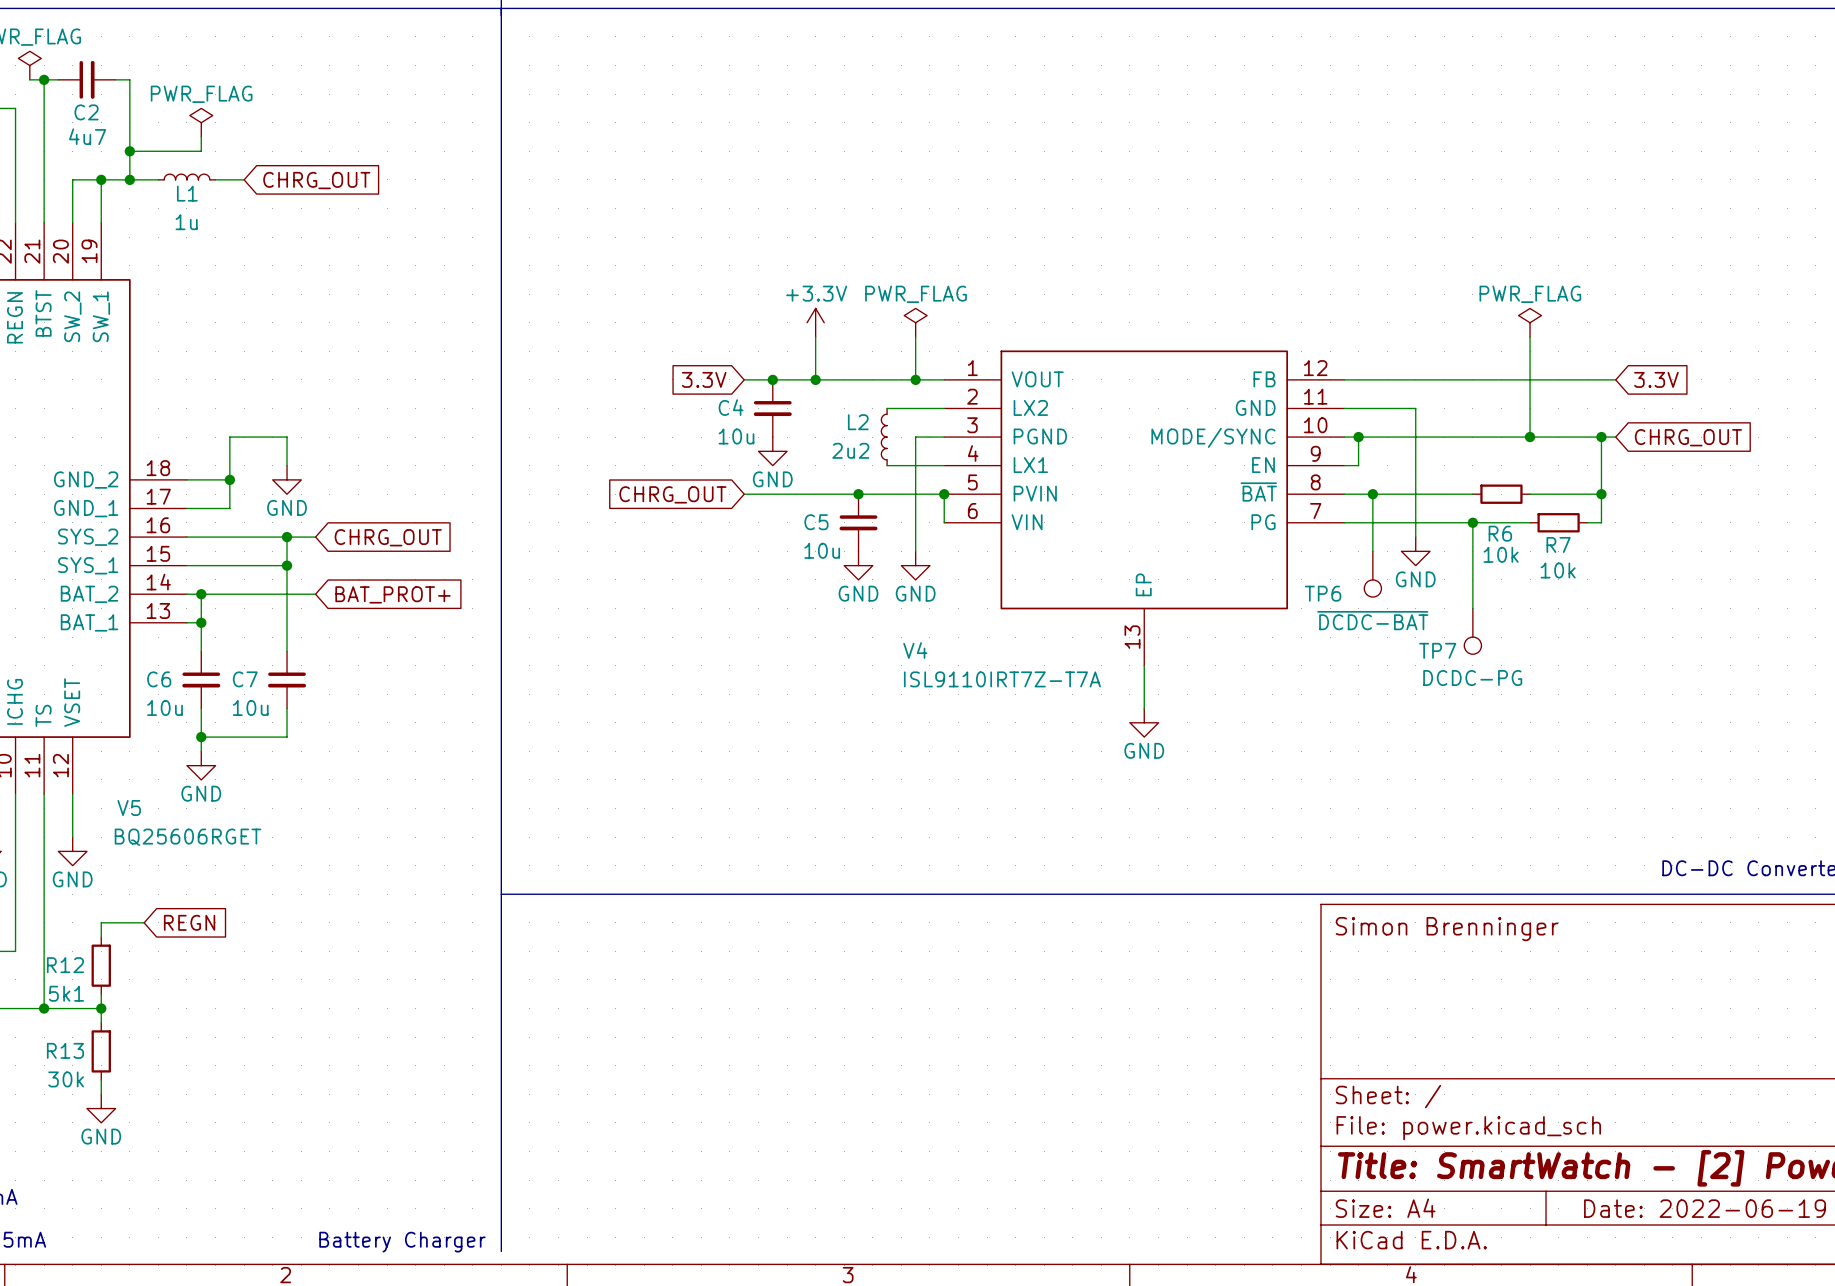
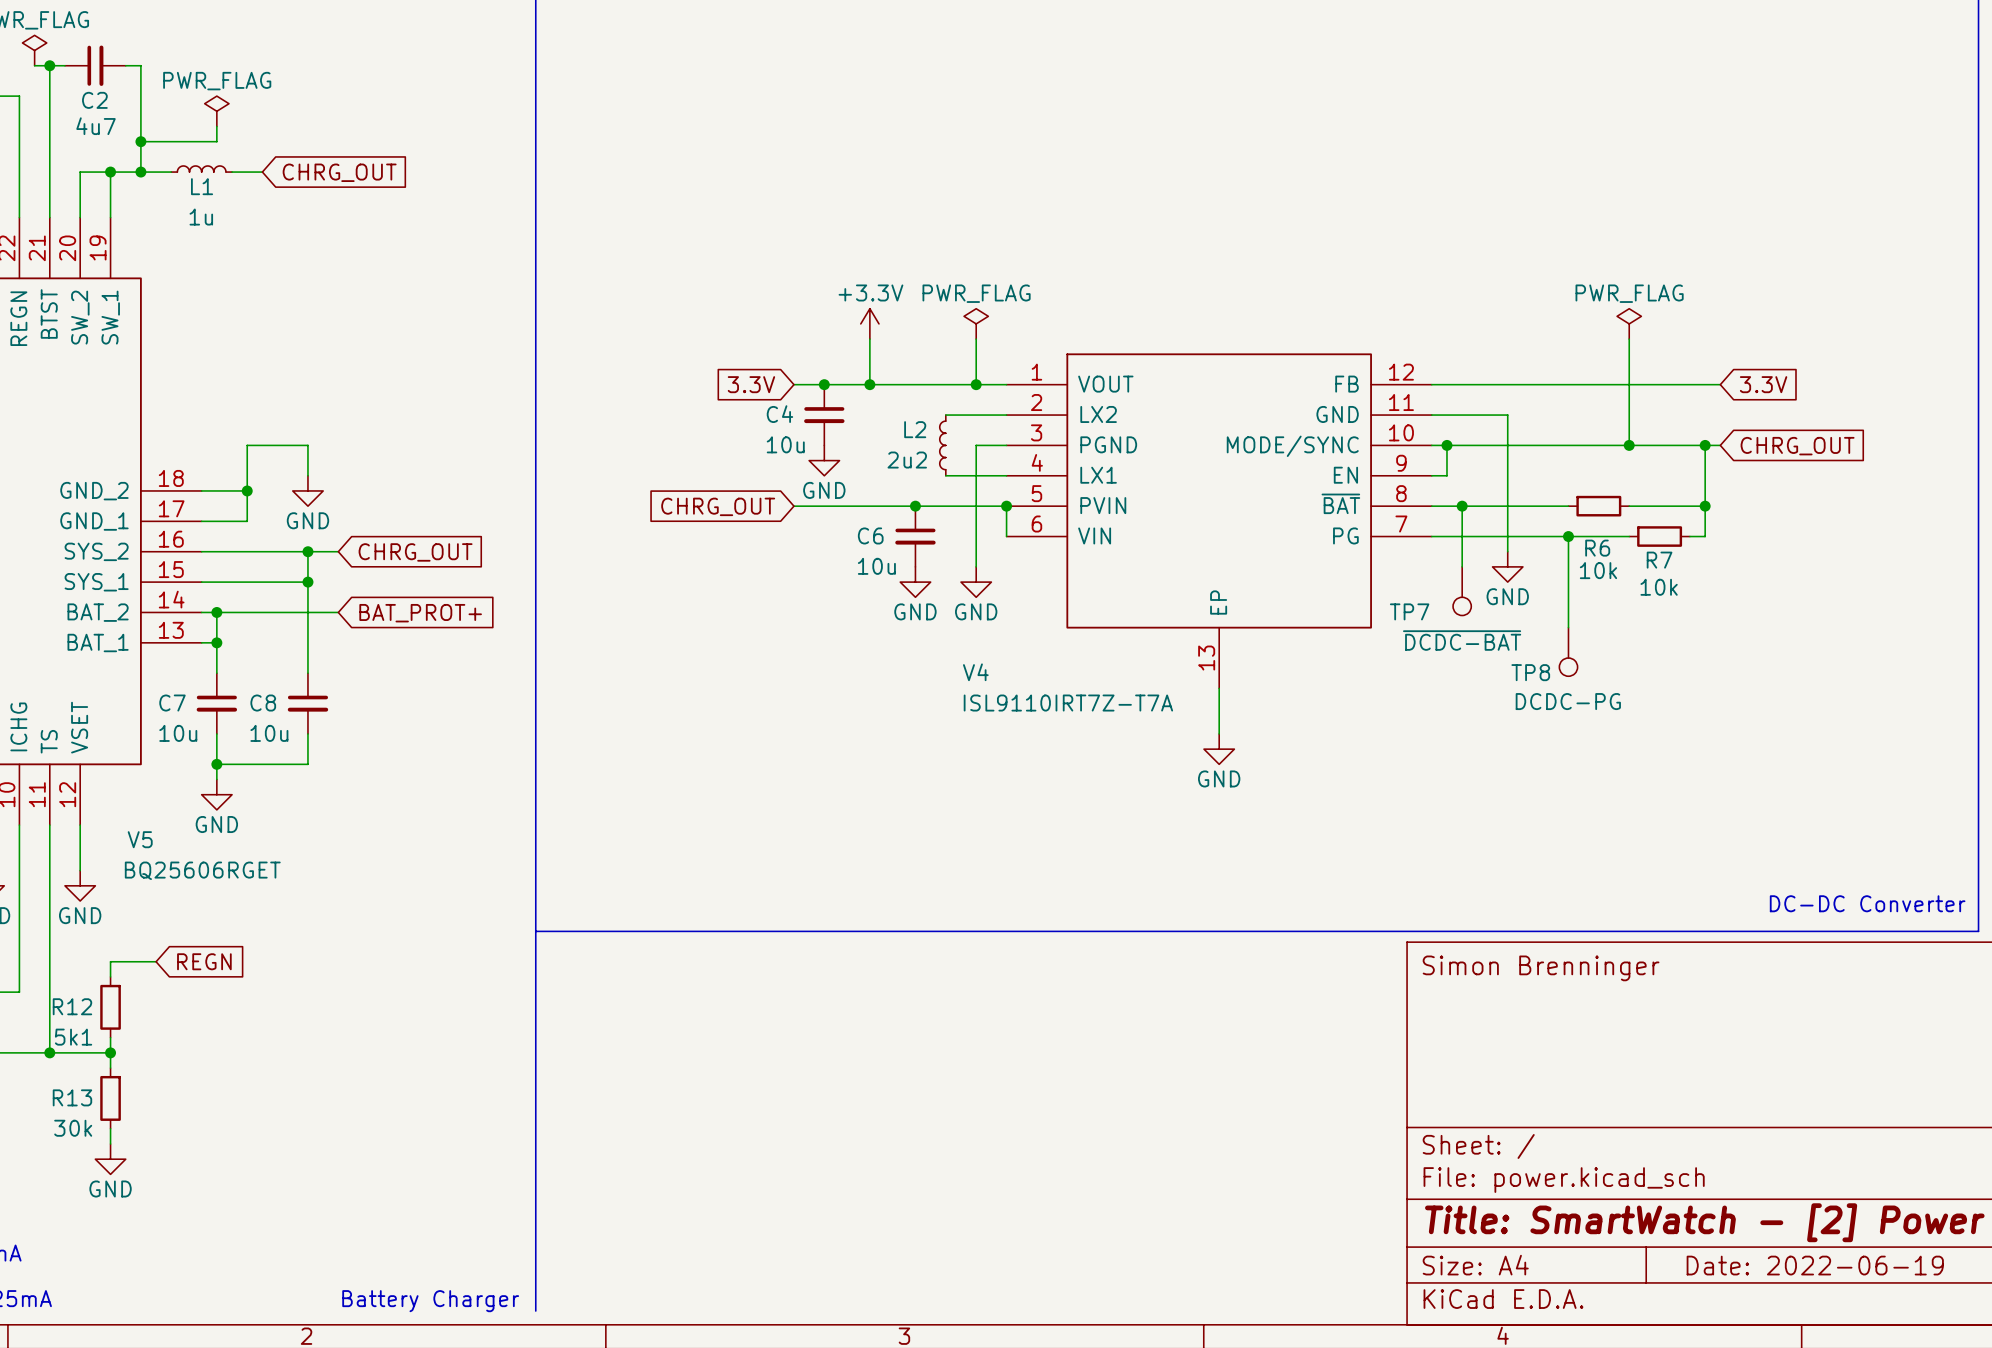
C5 name: C5 (816, 522) -> C6 (870, 535)
TP6 name: TP6 (1323, 593) -> TP7 (1409, 611)
TP7 name: TP7 (1437, 650) -> TP8 (1530, 672)
C6 name: C6 (159, 679) -> C7 (172, 703)
C7 name: C7 (245, 679) -> C8 (263, 703)

